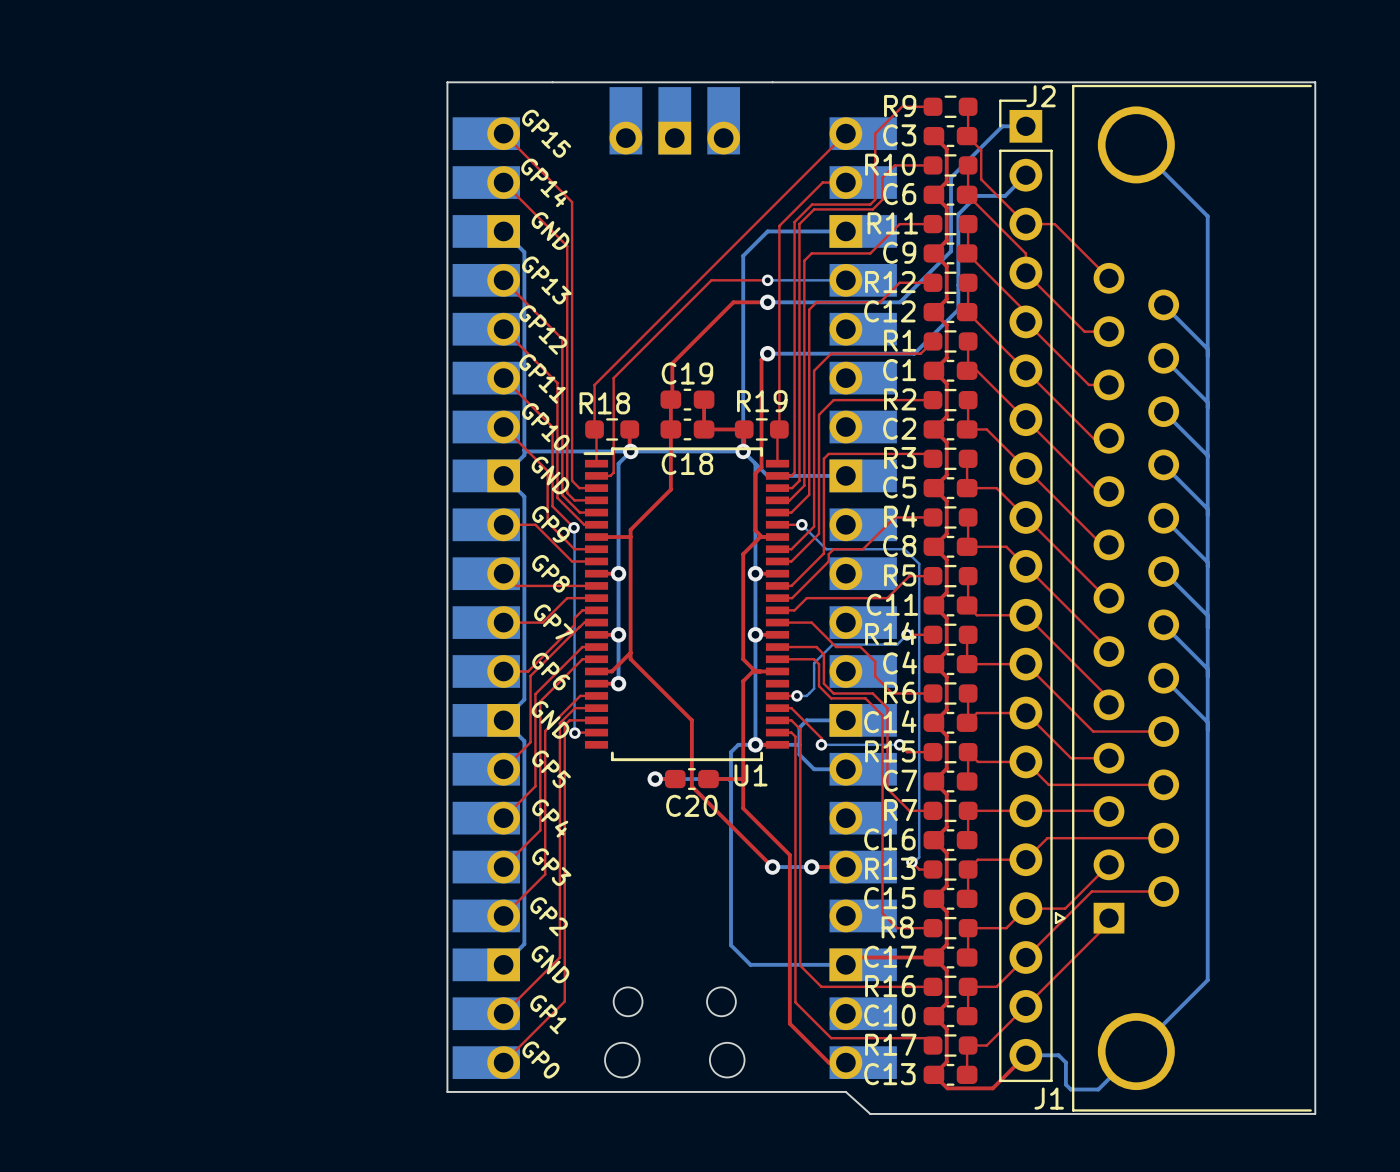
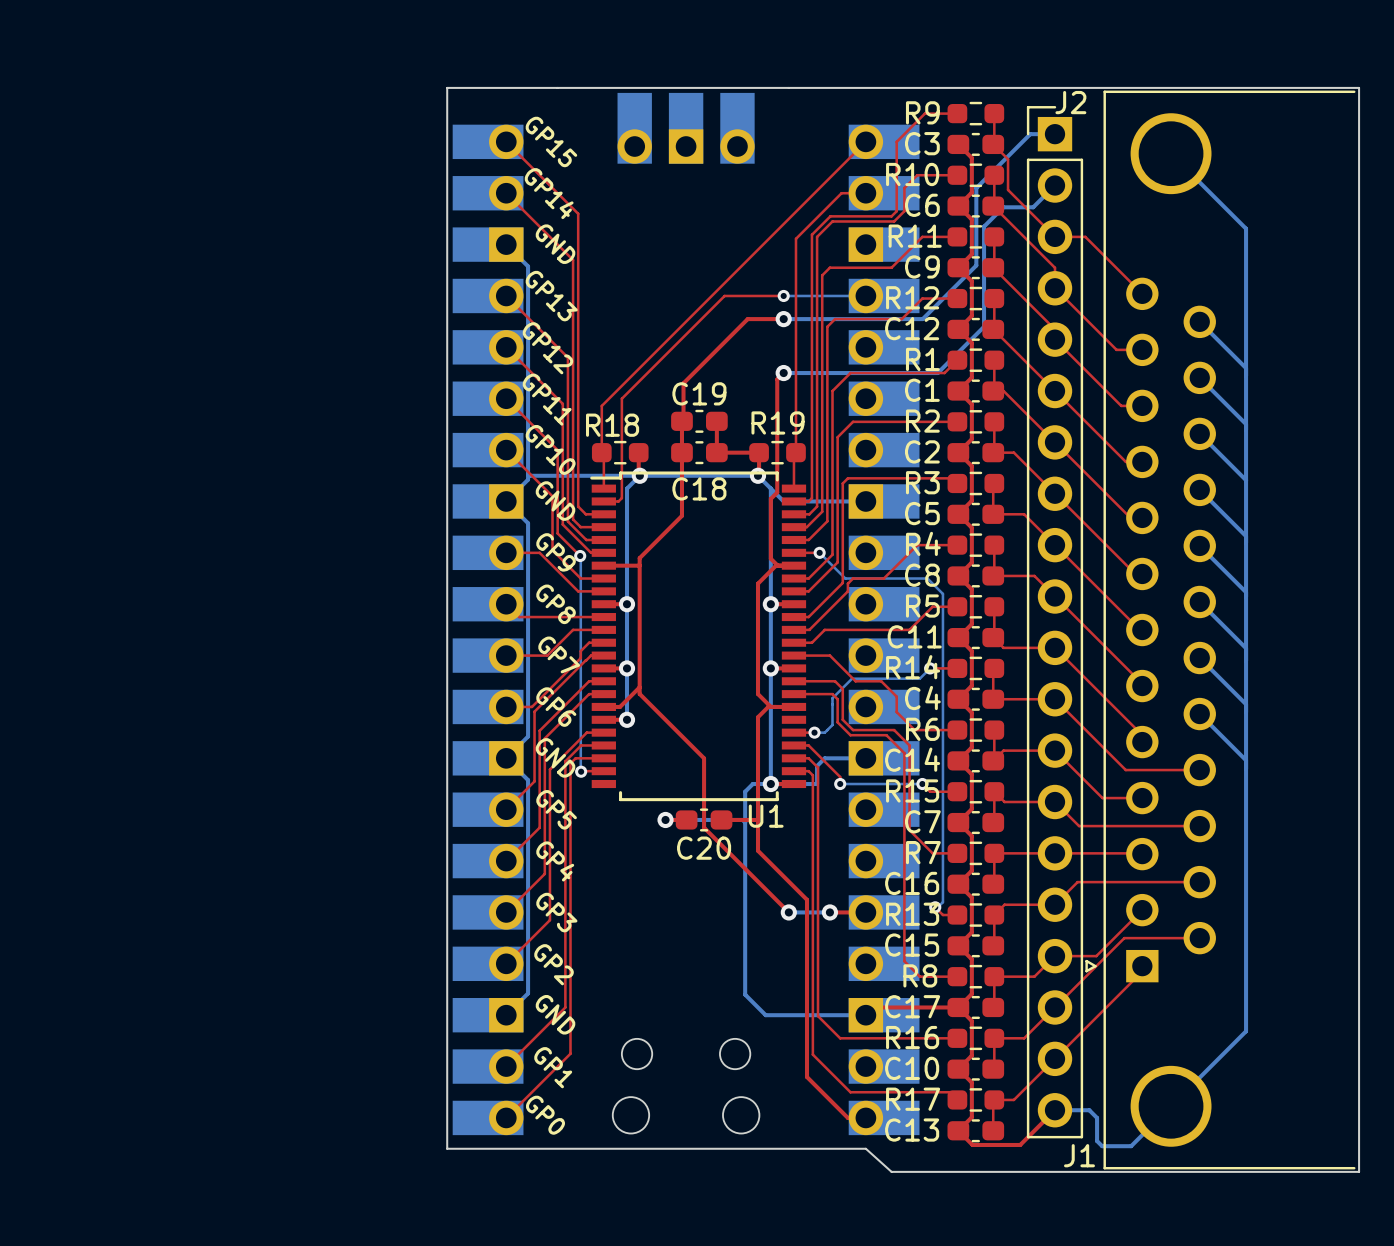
bottom track: (845, 231) (767, 231) (743, 255) (743, 451) -> none
bottom track: (799, 744) (799, 754) (814, 769) (845, 769) -> none

